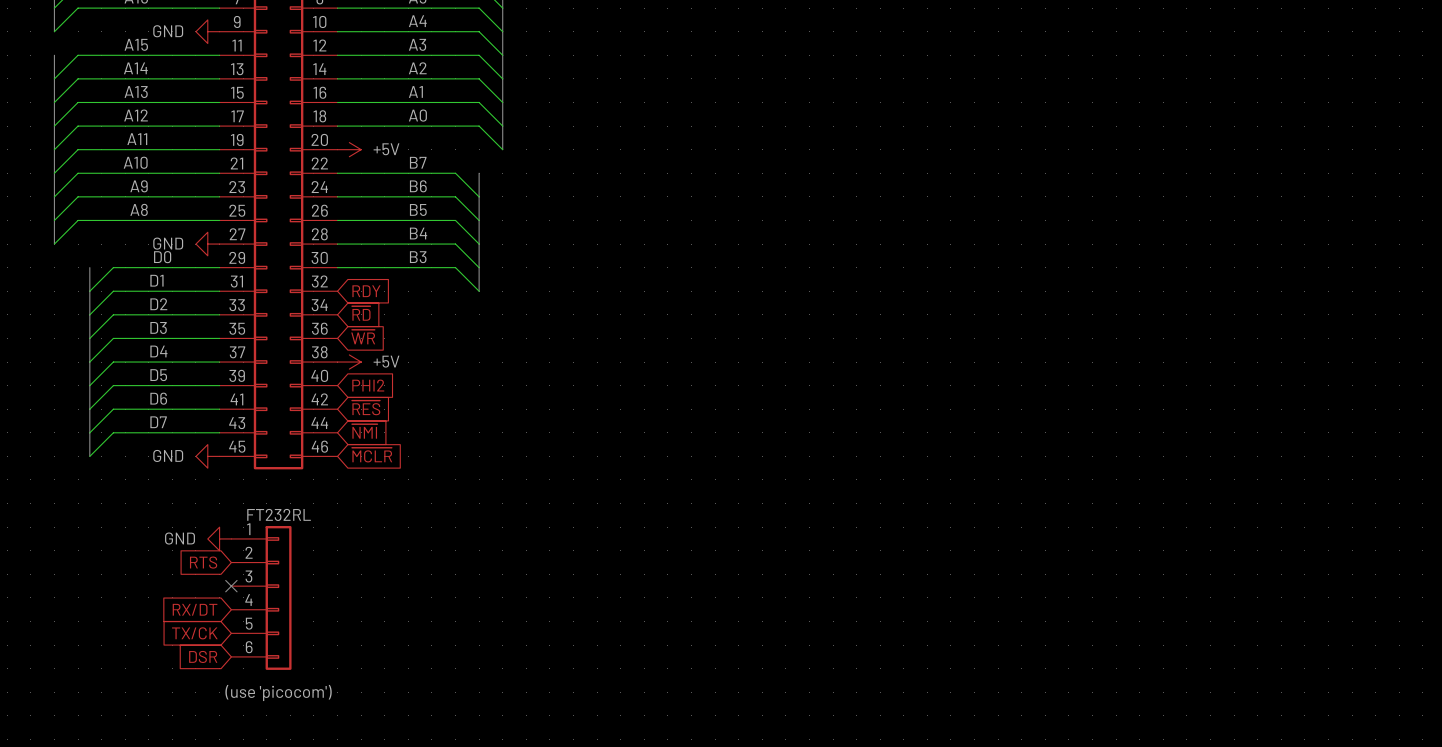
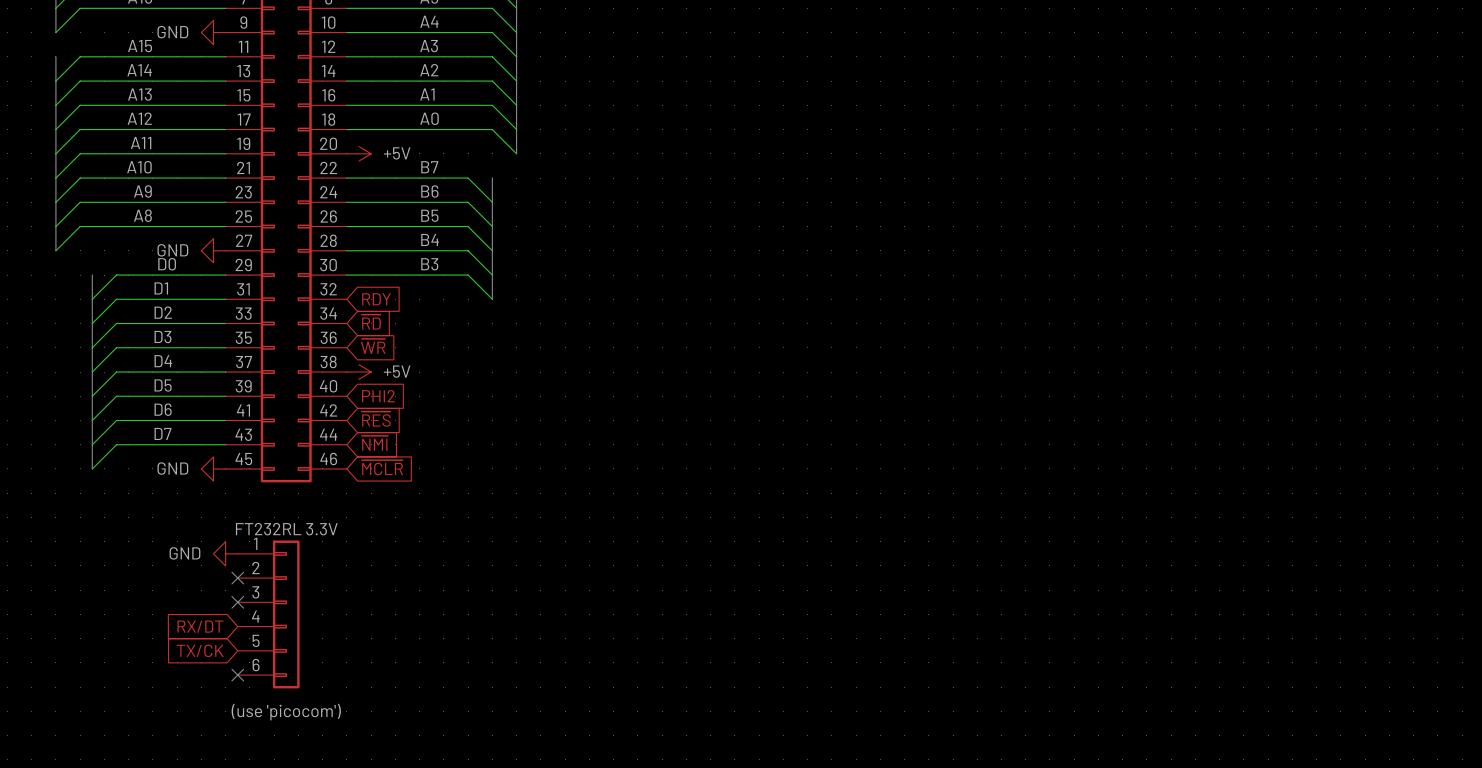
part text: FT232RL (279, 514) -> FT232RL 3.3V (286, 529)
global label: RTS (203, 562) -> none
no-connect mark: none -> (237, 578)
global label: DSR (203, 656) -> none
no-connect mark: none -> (237, 675)

